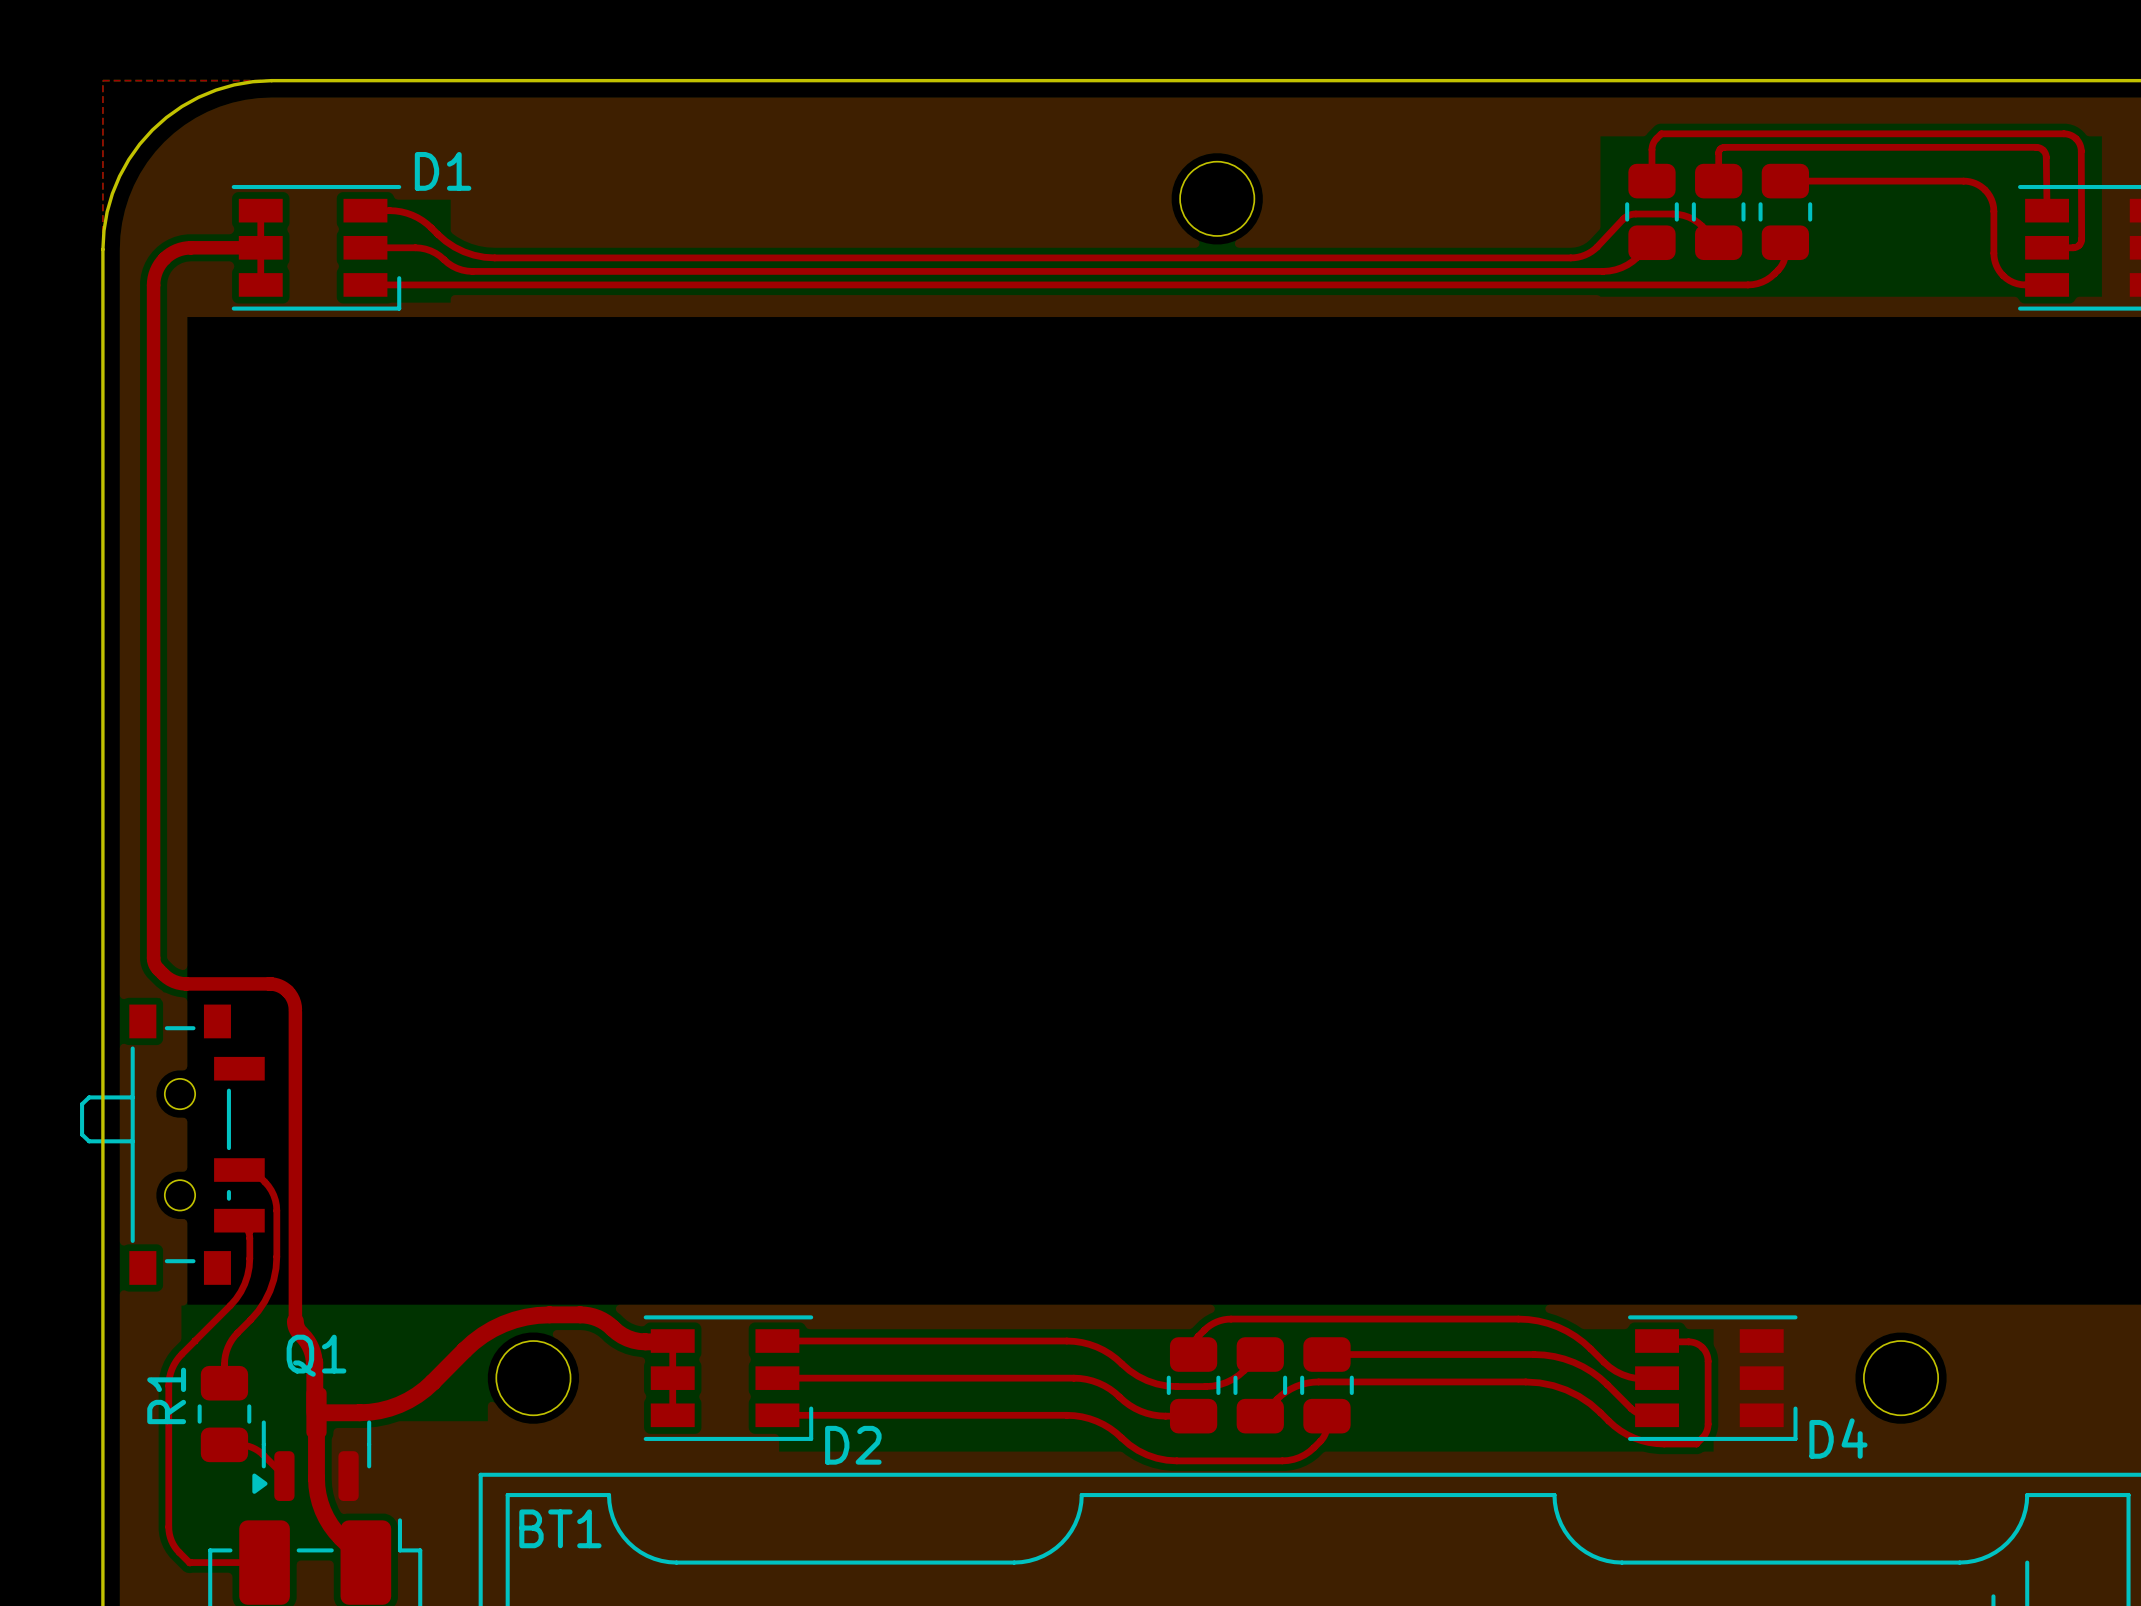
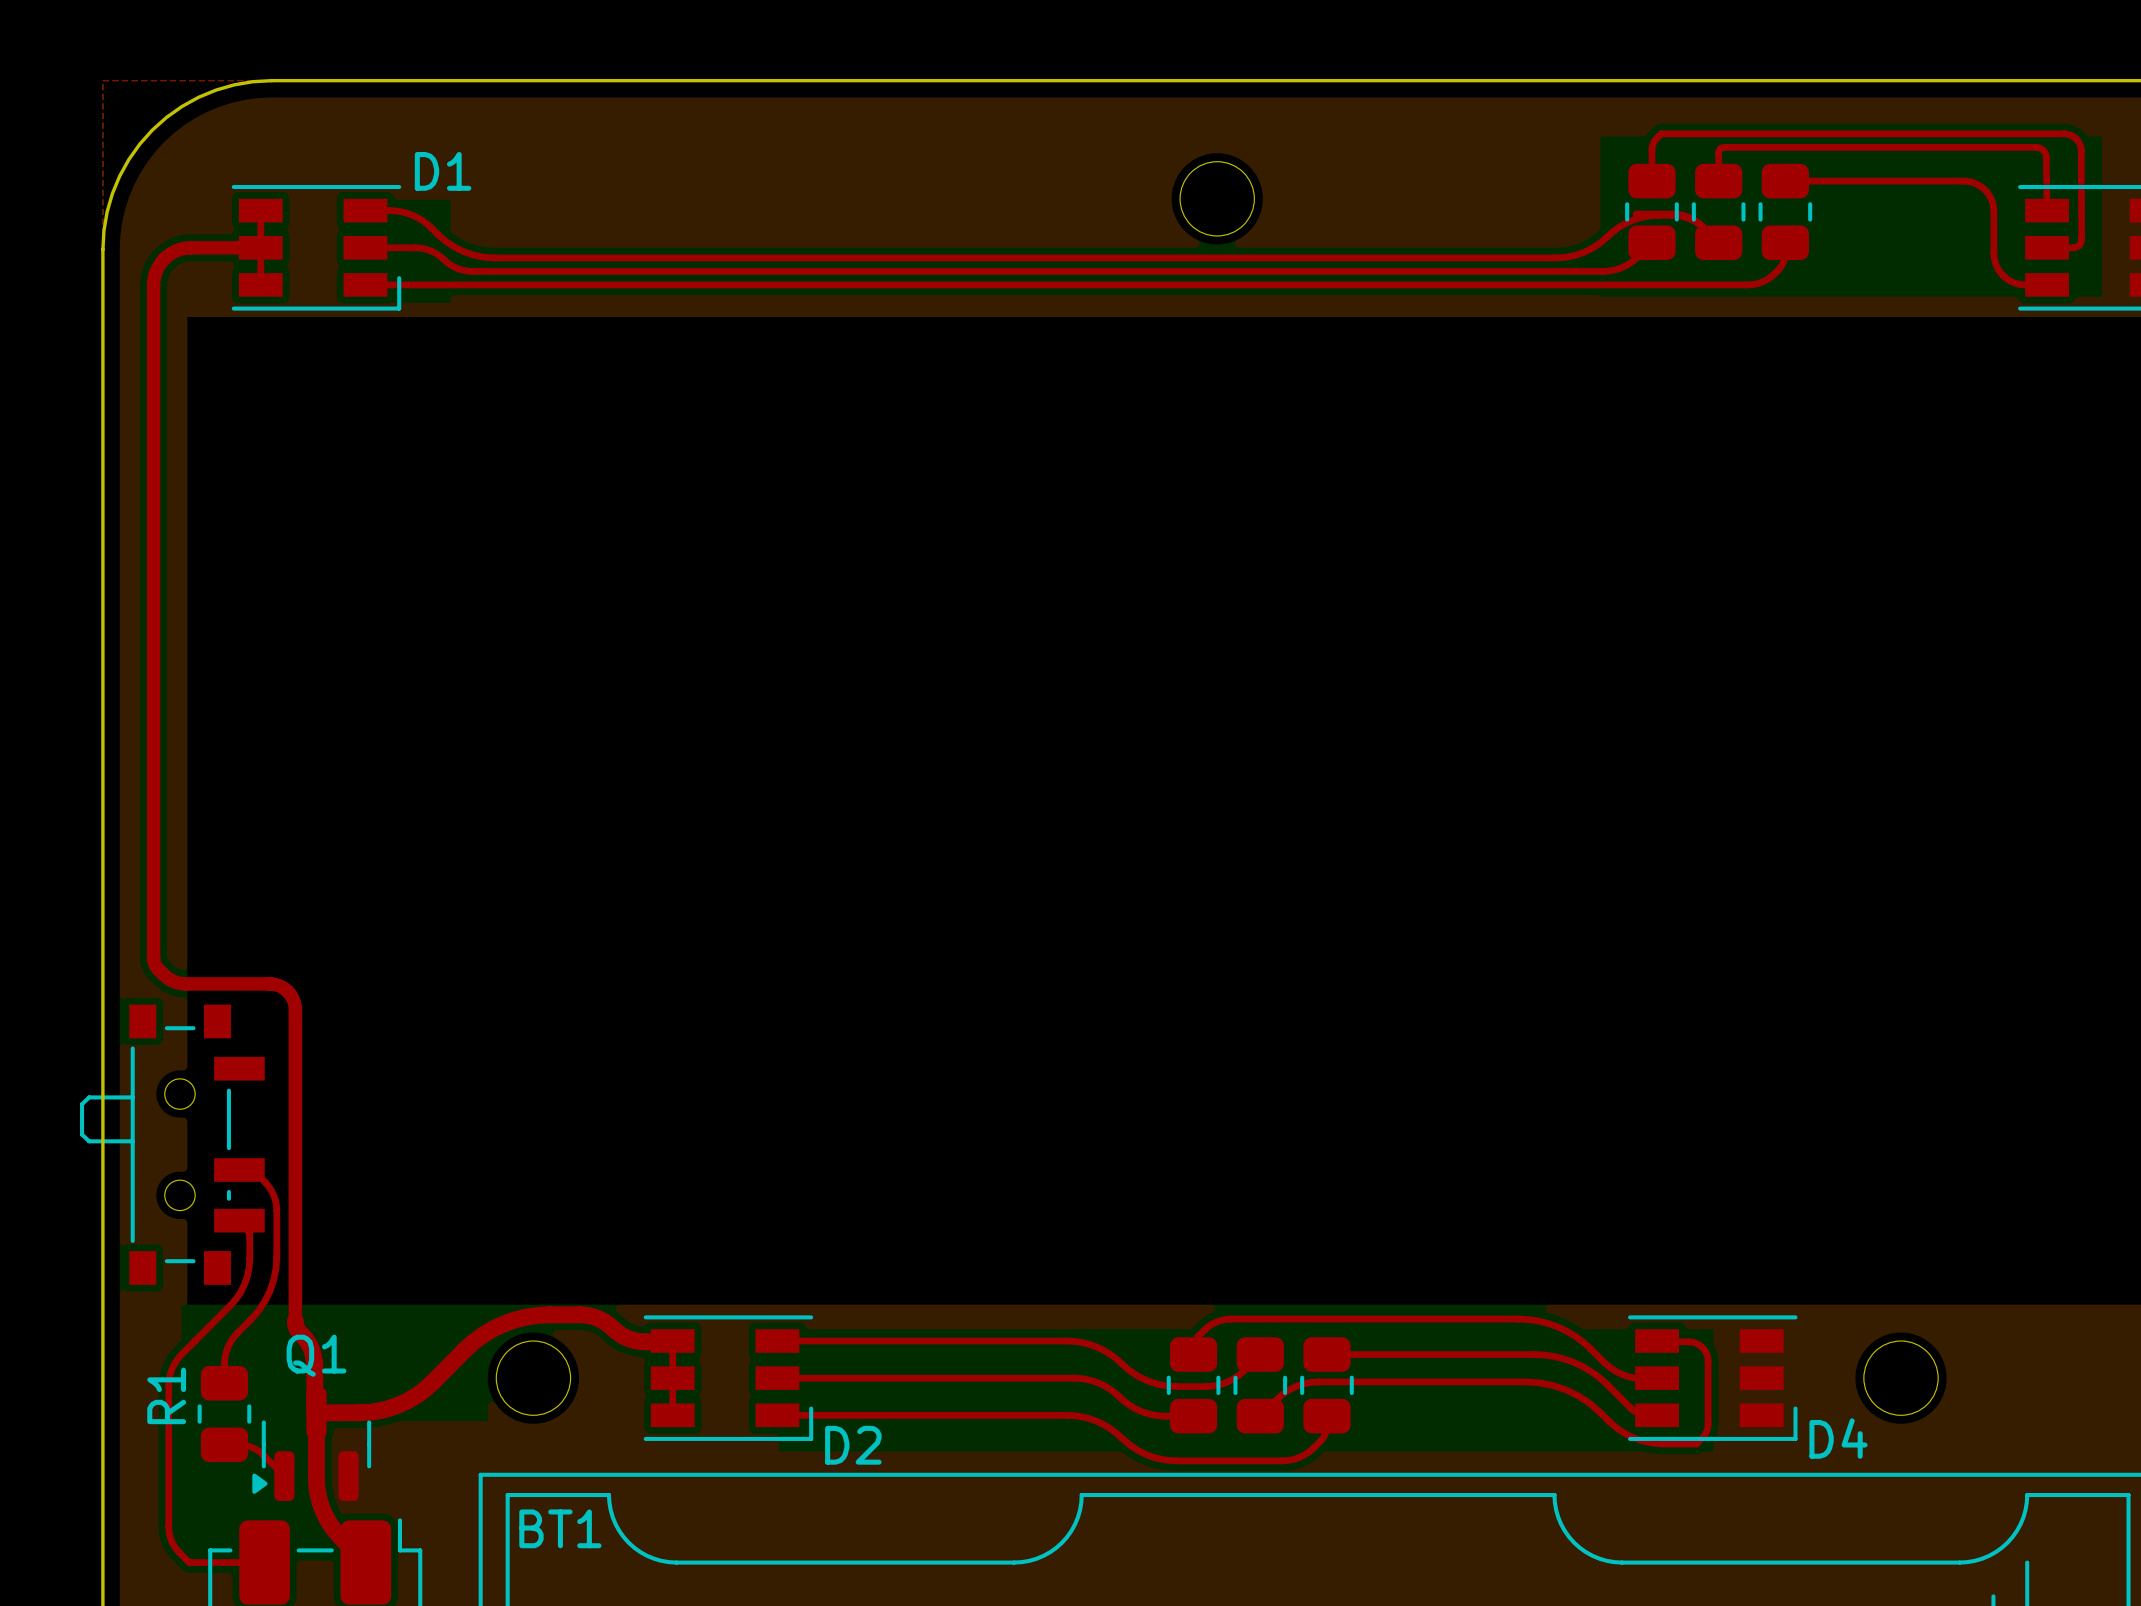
top track: (1635, 214) (1624, 217) (1597, 247) (1588, 253) (1574, 257) (1556, 257) -> (1704, 229) (1693, 220) (1680, 216) (1644, 216) (1624, 223) (1600, 242) (1583, 252) (1556, 257)

